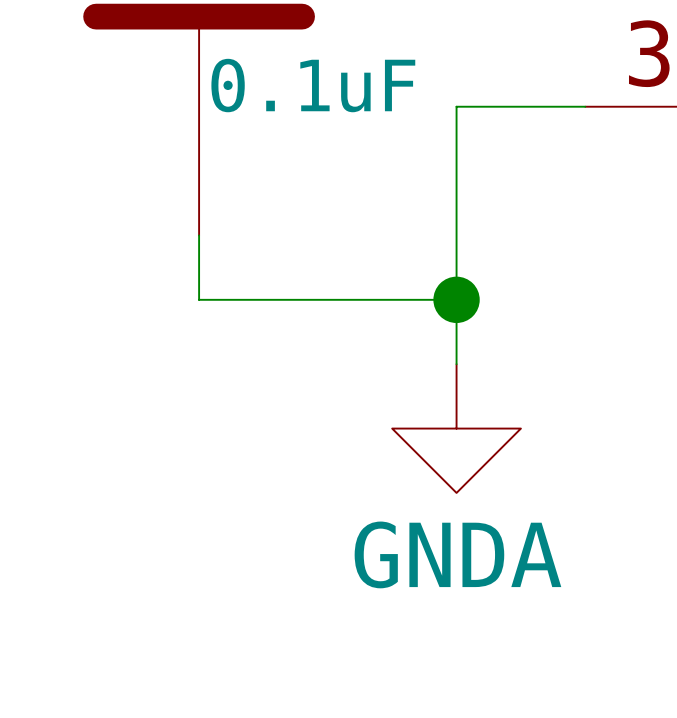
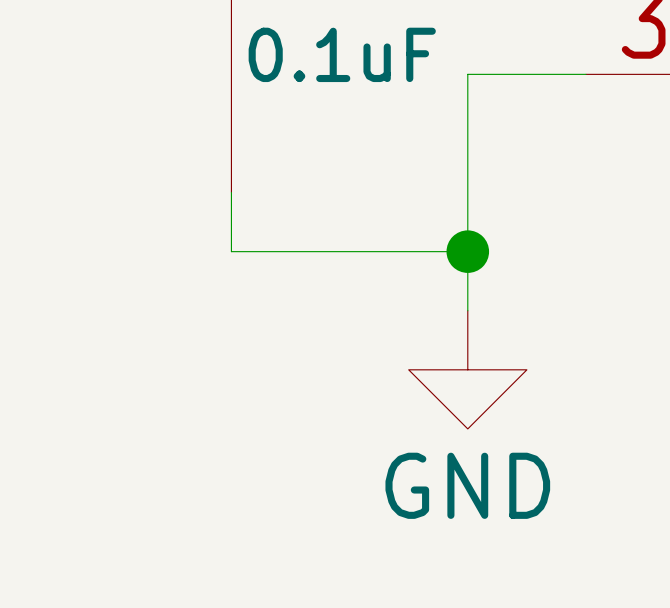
power symbol: GNDA (456, 428) -> GND (467, 369)

